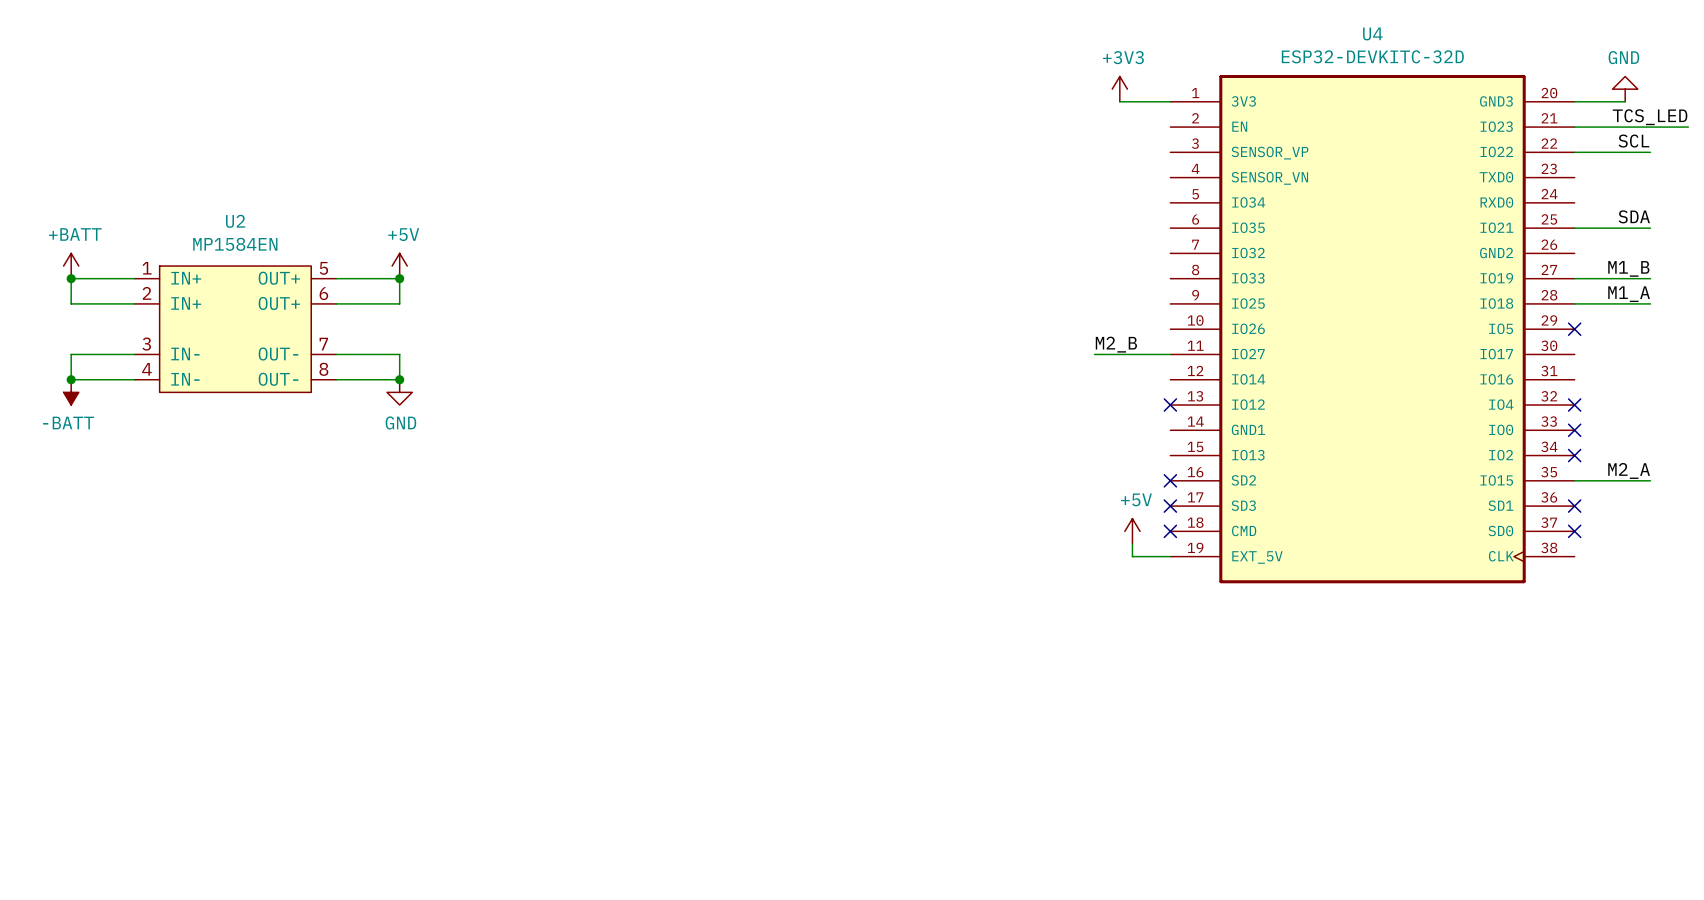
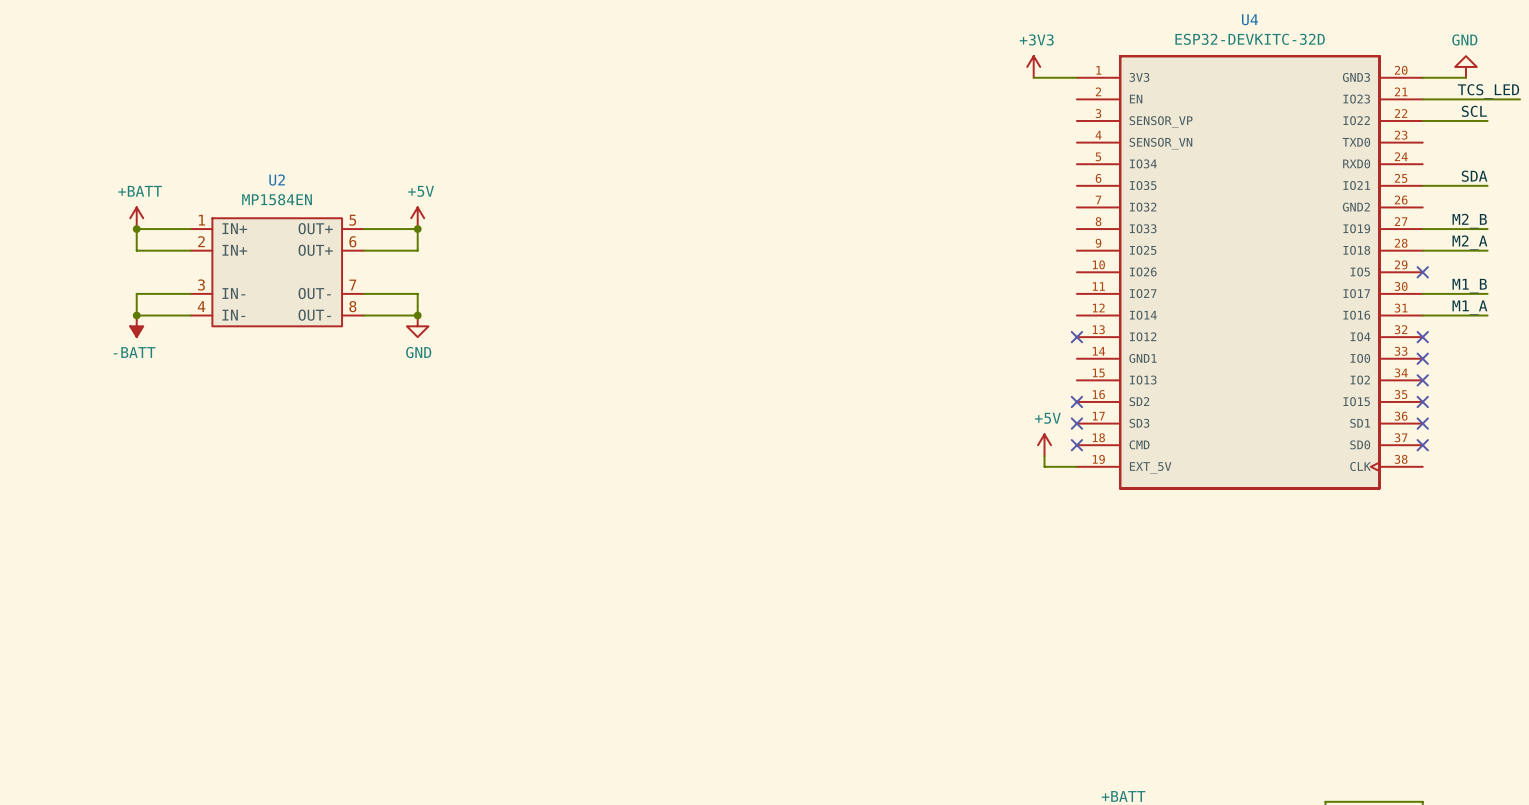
label: M1_B (1628, 268) -> M2_B (1469, 221)
label: M1_A (1629, 294) -> M2_A (1469, 242)
label: M2_B (1116, 344) -> none
label: none -> M1_B (1469, 286)
wire: (1094, 354) (1170, 354) -> none
wire: none -> (1422, 293) (1487, 293)
label: none -> M1_A (1469, 307)
label: M2_A (1629, 470) -> none
wire: (1574, 480) (1650, 480) -> (1422, 315) (1487, 315)
no-connect mark: none -> (1422, 401)

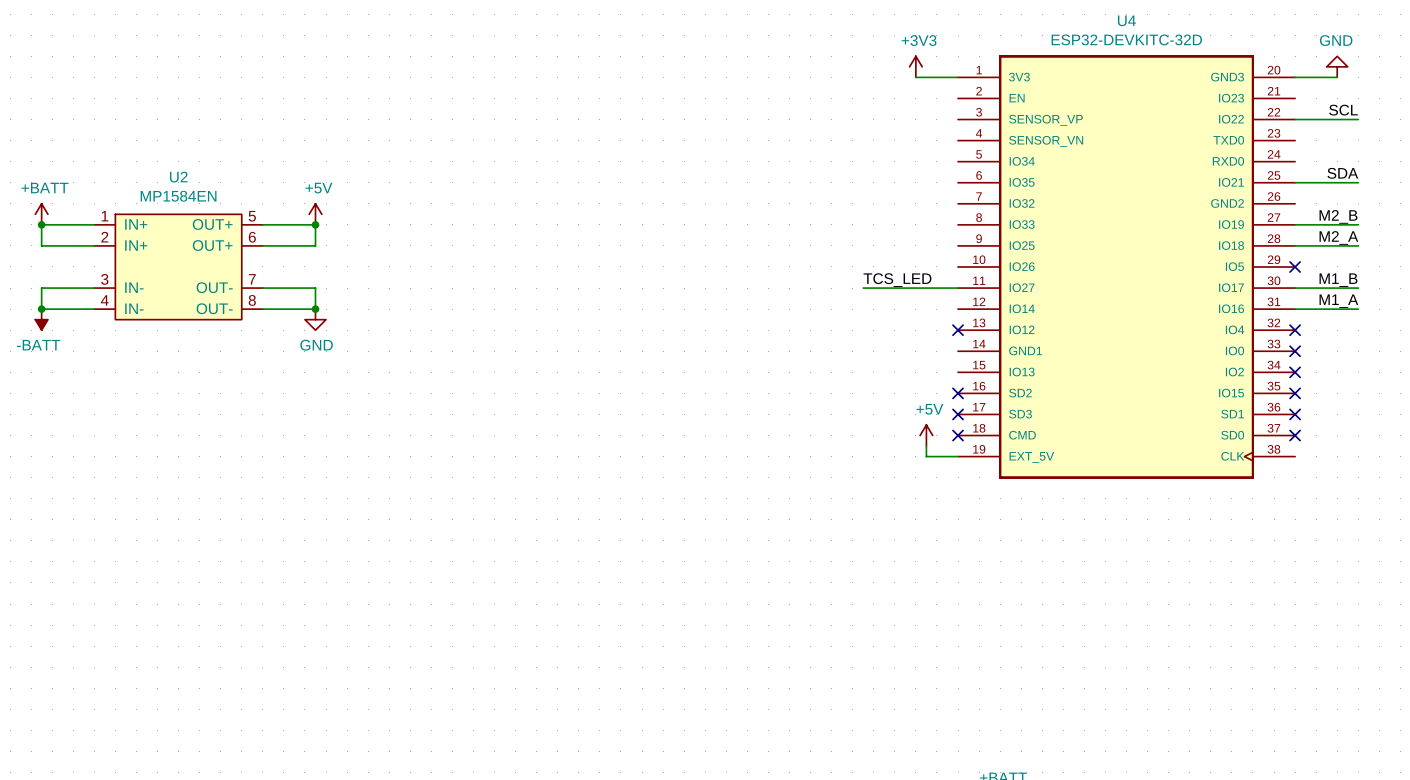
label: TCS_LED (1488, 91) -> none
wire: (1422, 99) (1520, 99) -> none
label: none -> TCS_LED (897, 280)
wire: none -> (863, 288) (958, 288)

